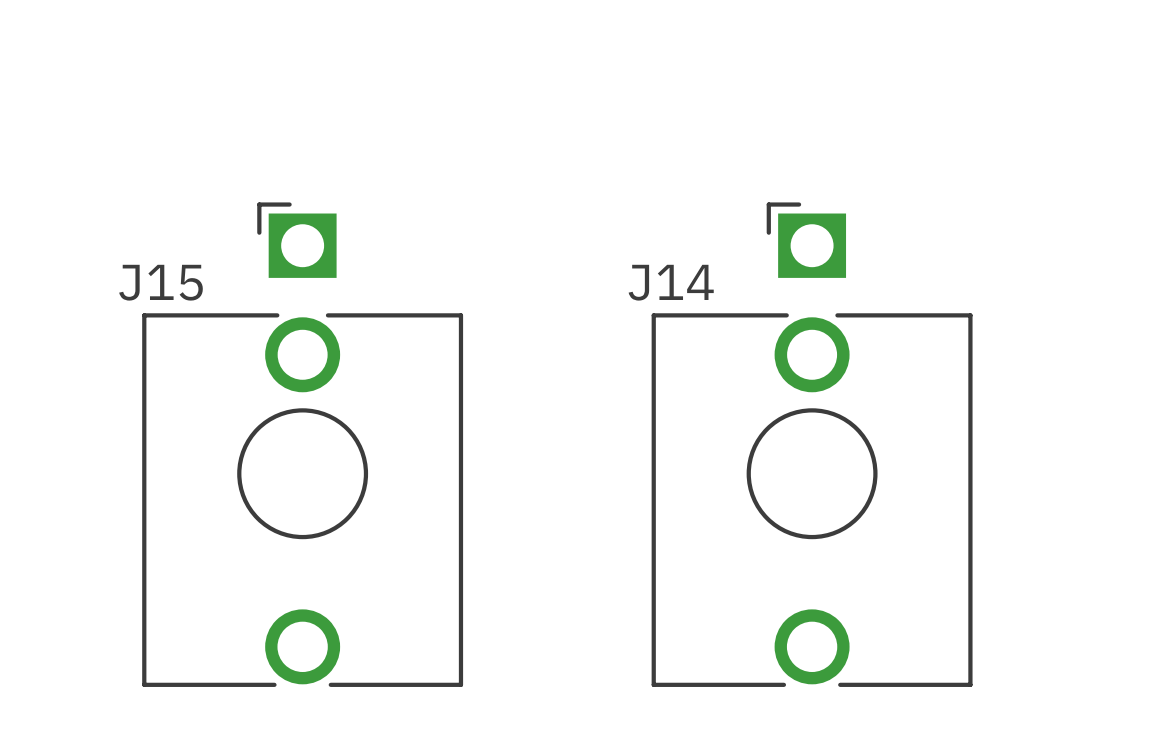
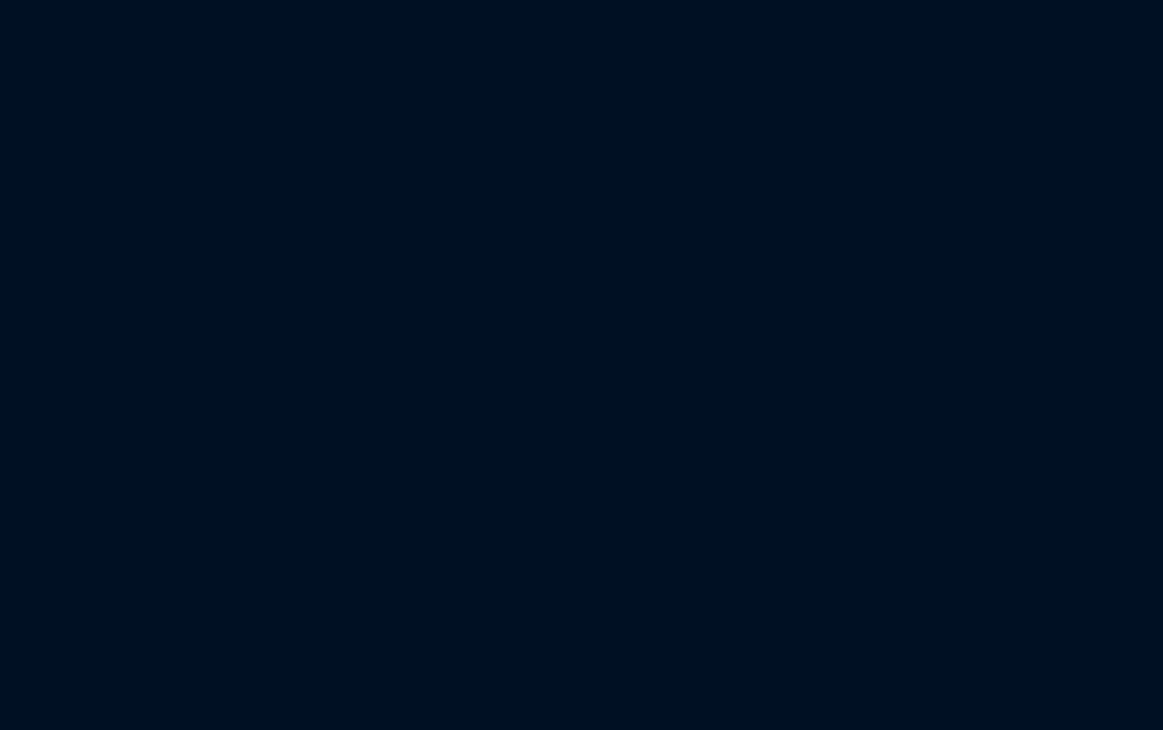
J15: (302, 444) -> none
J14: (812, 444) -> none

